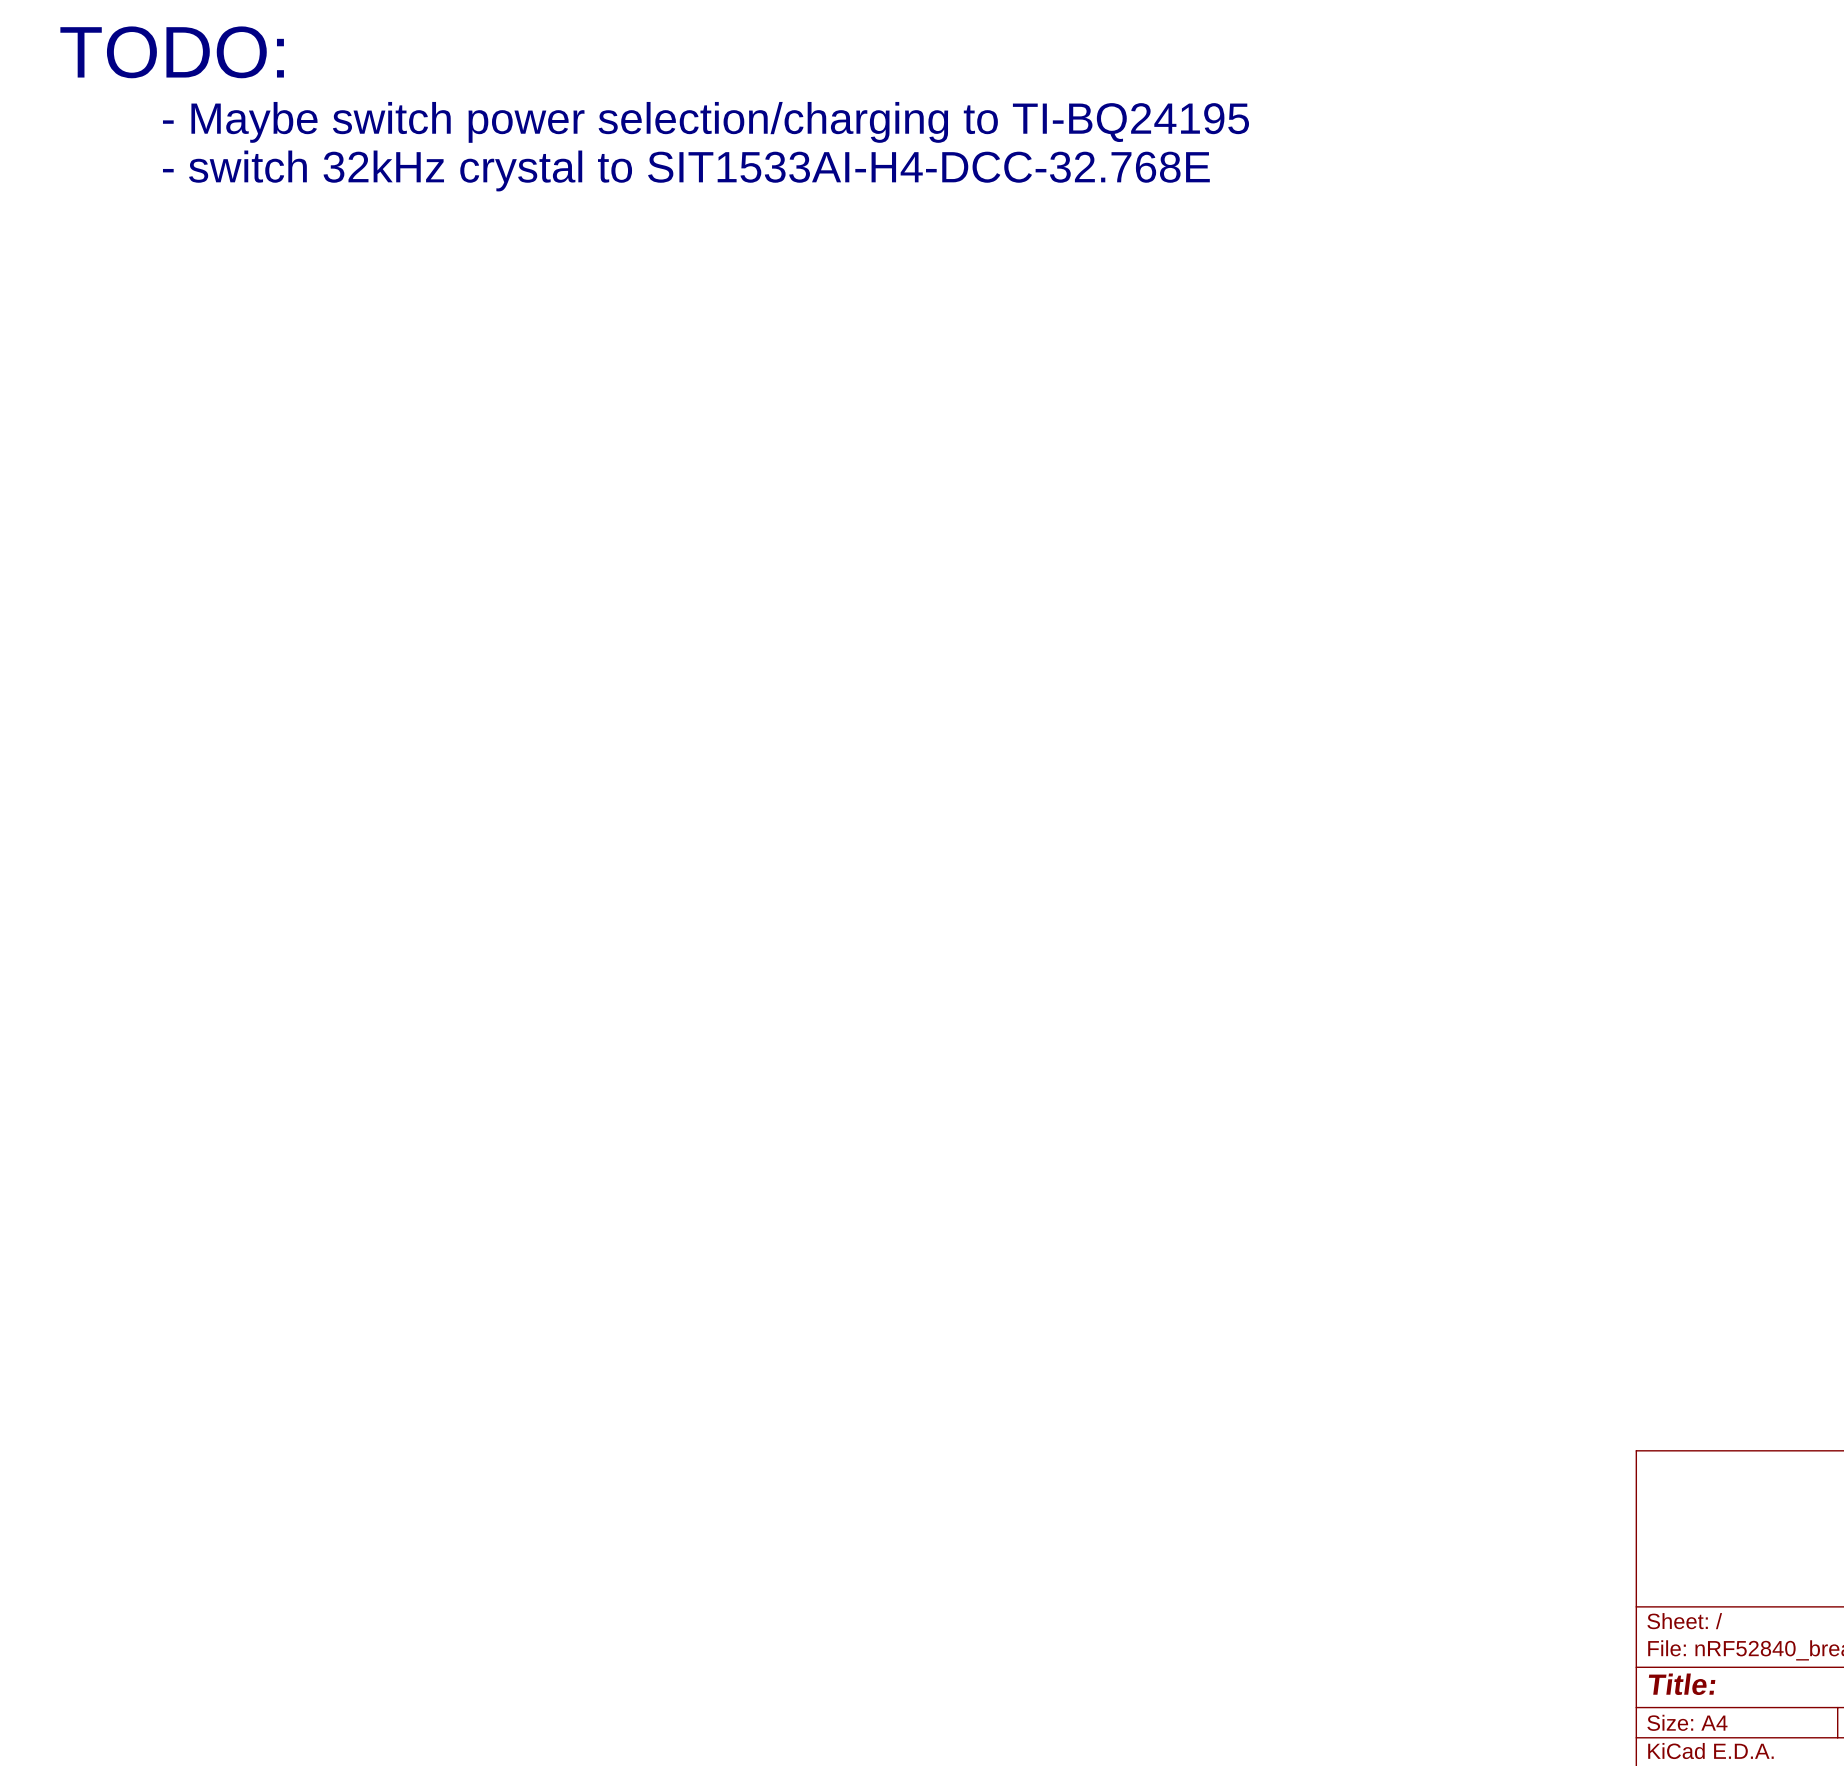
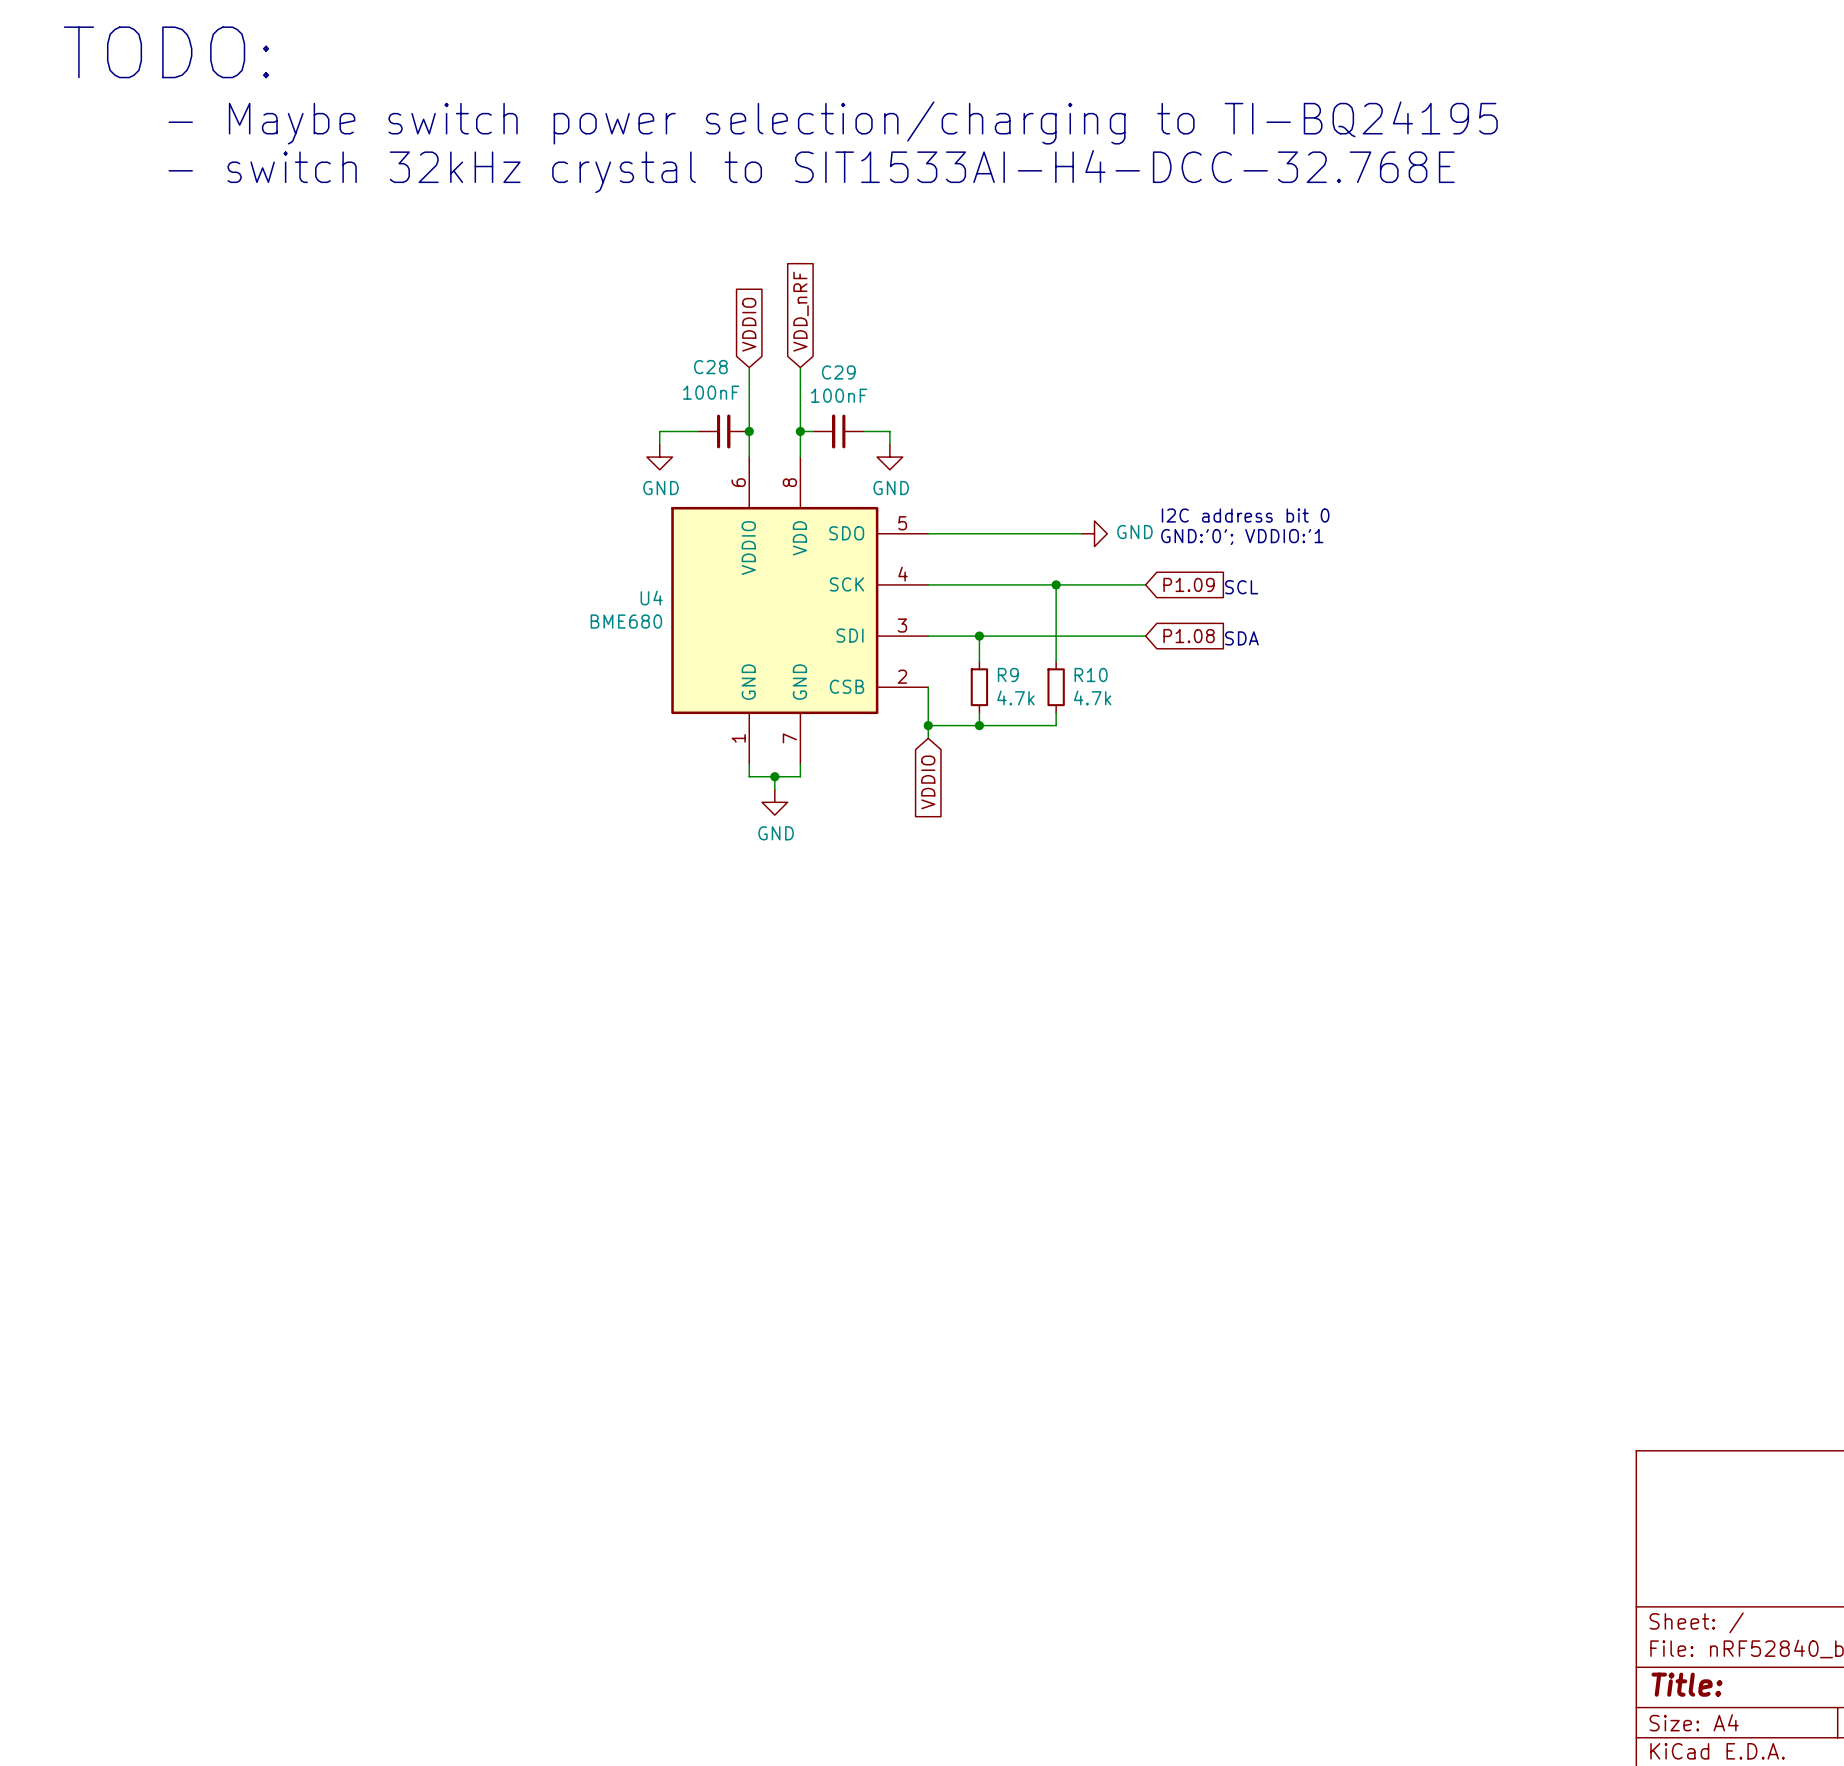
global label: none -> VDD_nRF (801, 311)
global label: none -> VDDIO (749, 324)
wire: none -> (749, 367) (749, 457)
wire: none -> (800, 367) (800, 457)
wire: none -> (698, 431) (659, 431) (659, 444)
C28: none -> 100nF (723, 431)
junction: none -> (749, 431)
wire: none -> (800, 431) (813, 431)
junction: none -> (800, 431)
C29: none -> 100nF (838, 431)
wire: none -> (864, 431) (889, 431) (889, 444)
power symbol: none -> GND (659, 457)
power symbol: none -> GND (889, 457)
text: none -> I2C address bit 0 (1245, 515)
wire: none -> (928, 533) (1081, 533)
power symbol: none -> GND (1094, 533)
text: none -> GND:'0'; VDDIO:'1 (1242, 537)
wire: none -> (928, 584) (1145, 584)
wire: none -> (1056, 584) (1056, 661)
junction: none -> (1056, 584)
global label: none -> P1.09 (1189, 584)
text: none -> SCL (1241, 587)
U4: none -> BME680 (799, 610)
wire: none -> (928, 636) (1145, 636)
wire: none -> (979, 636) (979, 661)
junction: none -> (979, 636)
global label: none -> P1.08 (1189, 636)
text: none -> SDA (1241, 638)
wire: none -> (928, 687) (928, 738)
R9: none -> 4.7k (979, 687)
R10: none -> 4.7k (1056, 687)
wire: none -> (979, 712) (979, 725)
wire: none -> (1056, 712) (1056, 725) (928, 725)
junction: none -> (928, 725)
junction: none -> (979, 725)
wire: none -> (749, 763) (749, 776) (800, 776) (800, 763)
wire: none -> (774, 776) (774, 789)
junction: none -> (774, 776)
global label: none -> VDDIO (928, 782)
power symbol: none -> GND (774, 802)

